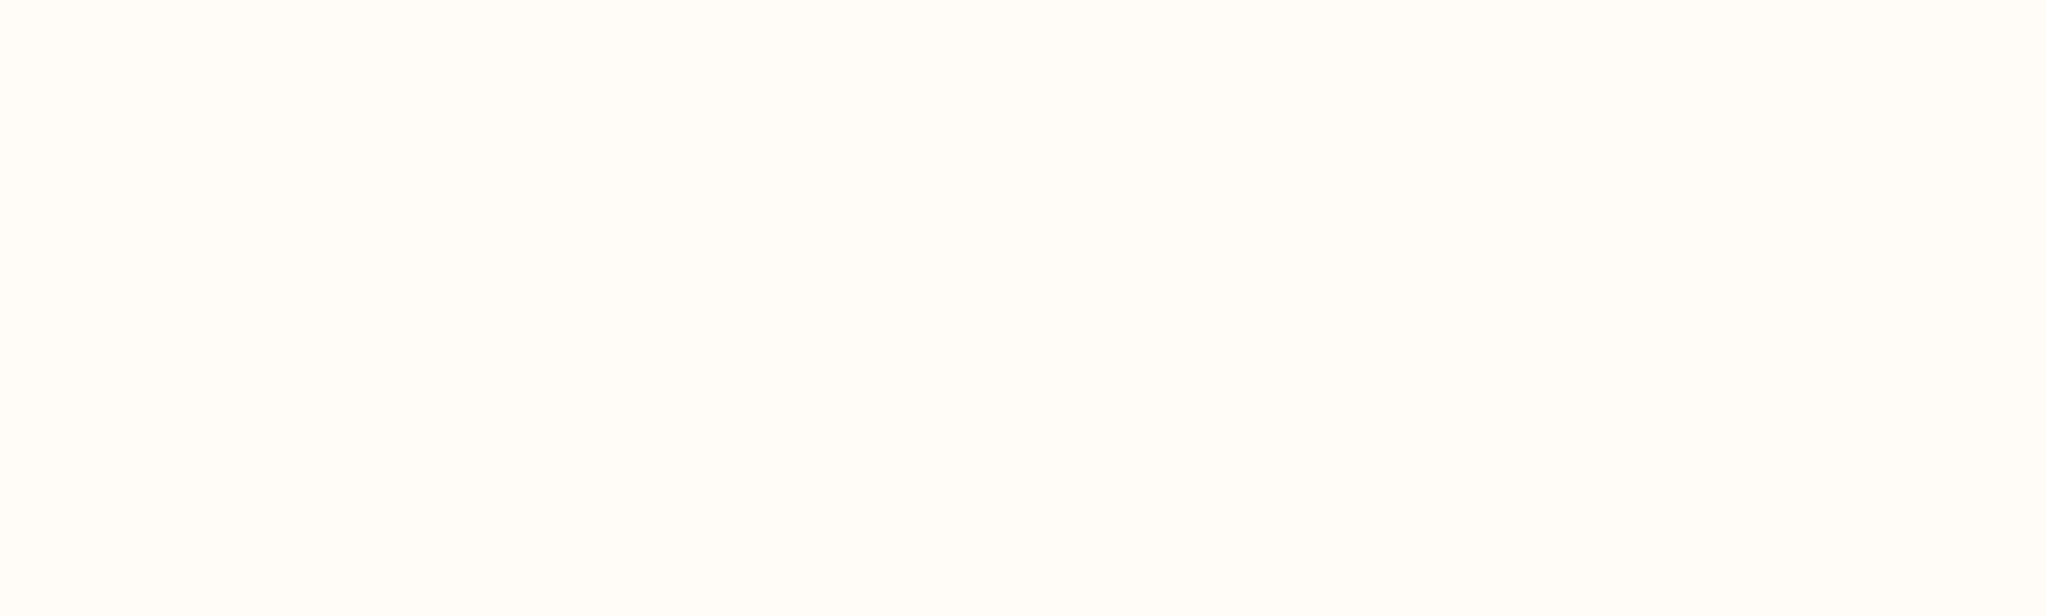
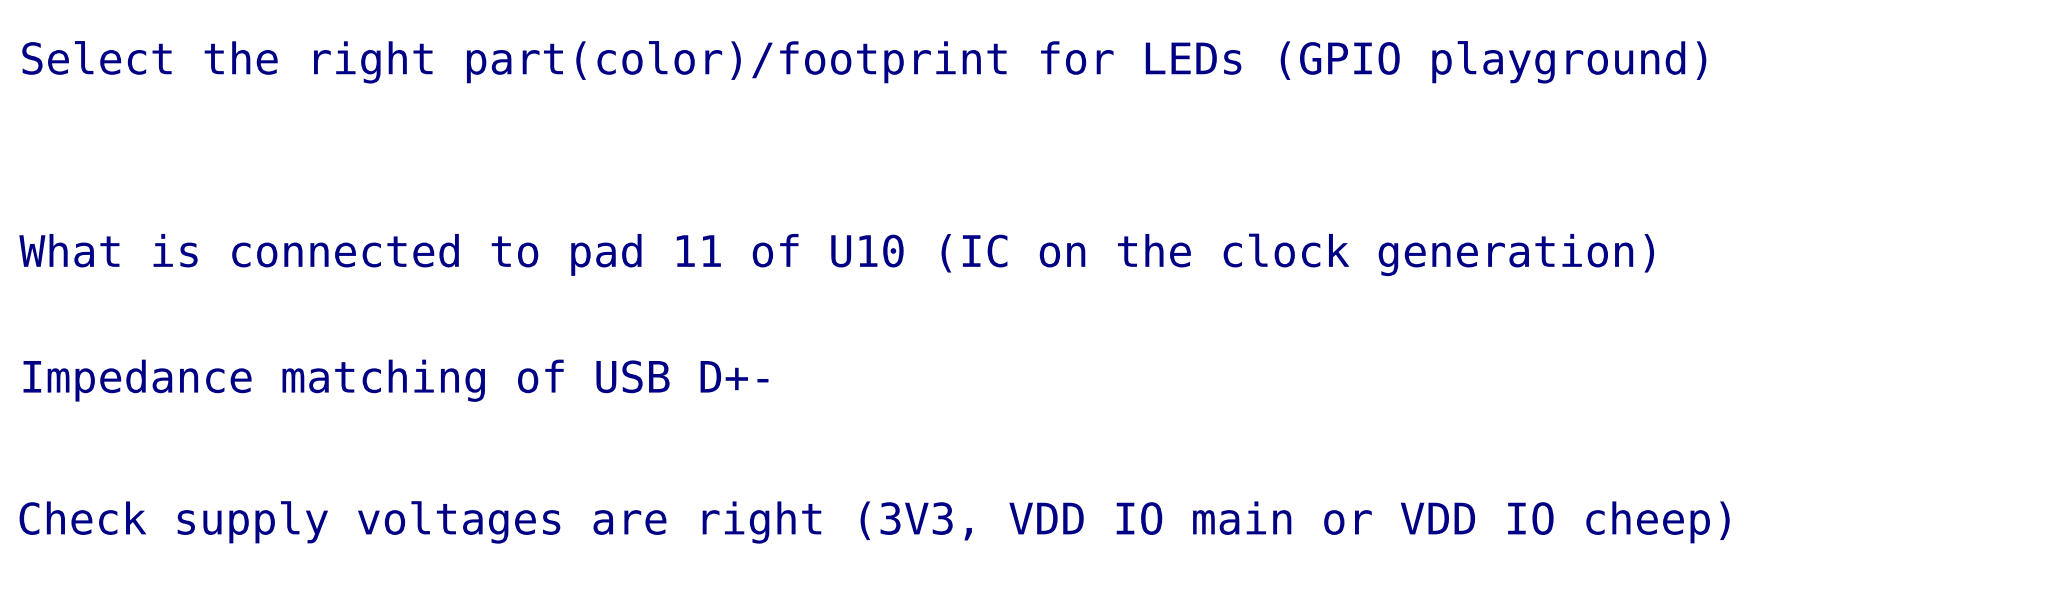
text: none -> Select the right part(color)/footprint for LEDs (GPIO playground) (864, 62)
text: none -> What is connected to pad 11 of U10 (IC on the clock generation) (836, 254)
text: none -> Impedance matching of USB D+- (396, 380)
text: none -> Check supply voltages are right (3V3, VDD IO main or VDD IO cheep) (874, 522)

